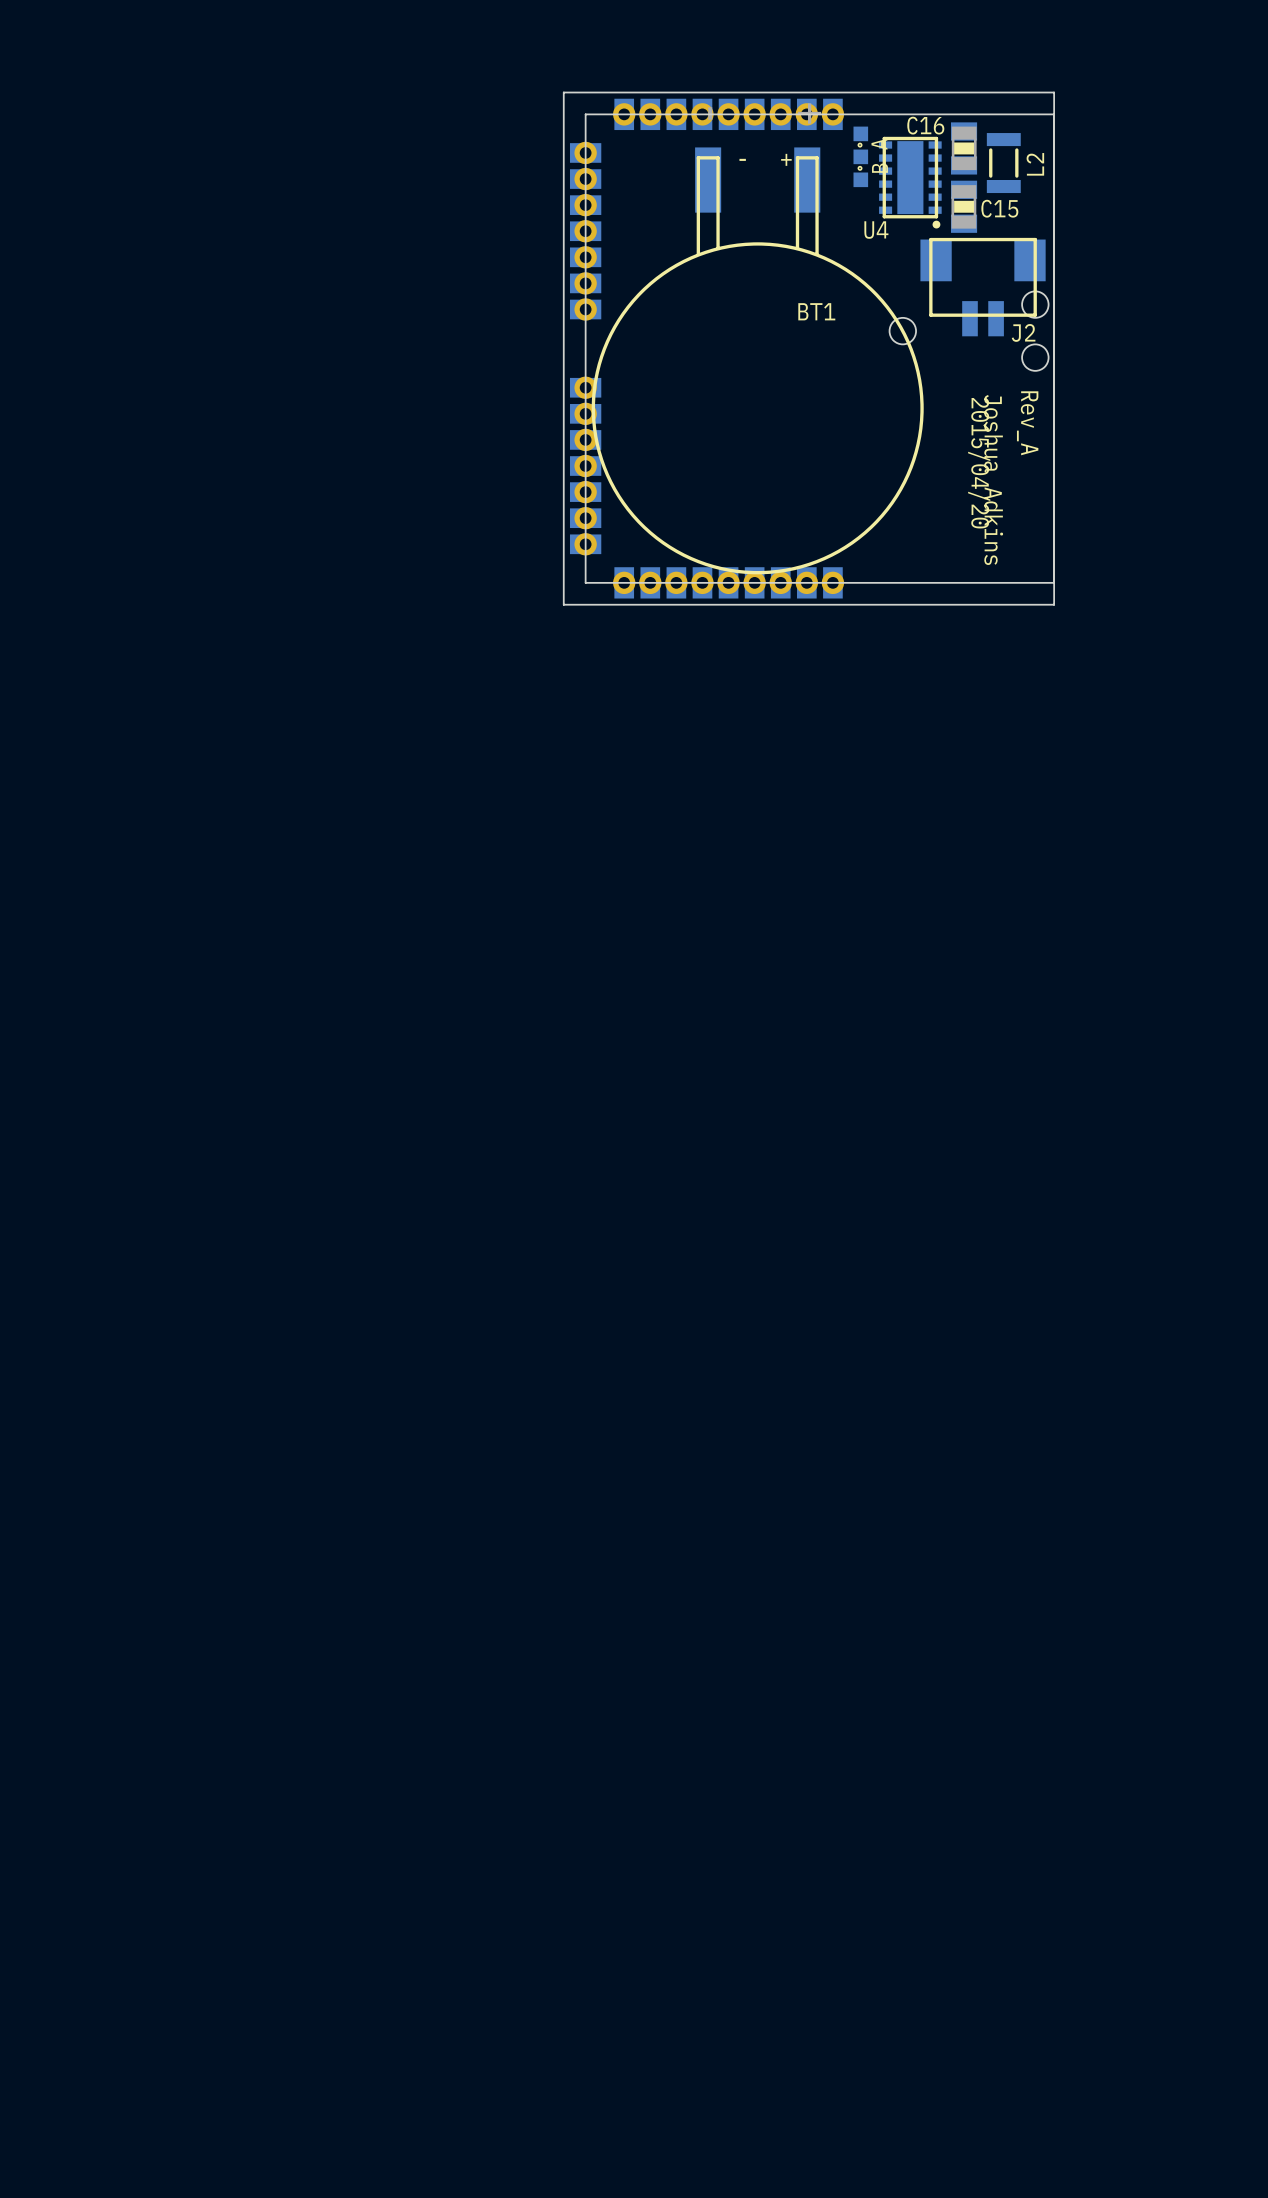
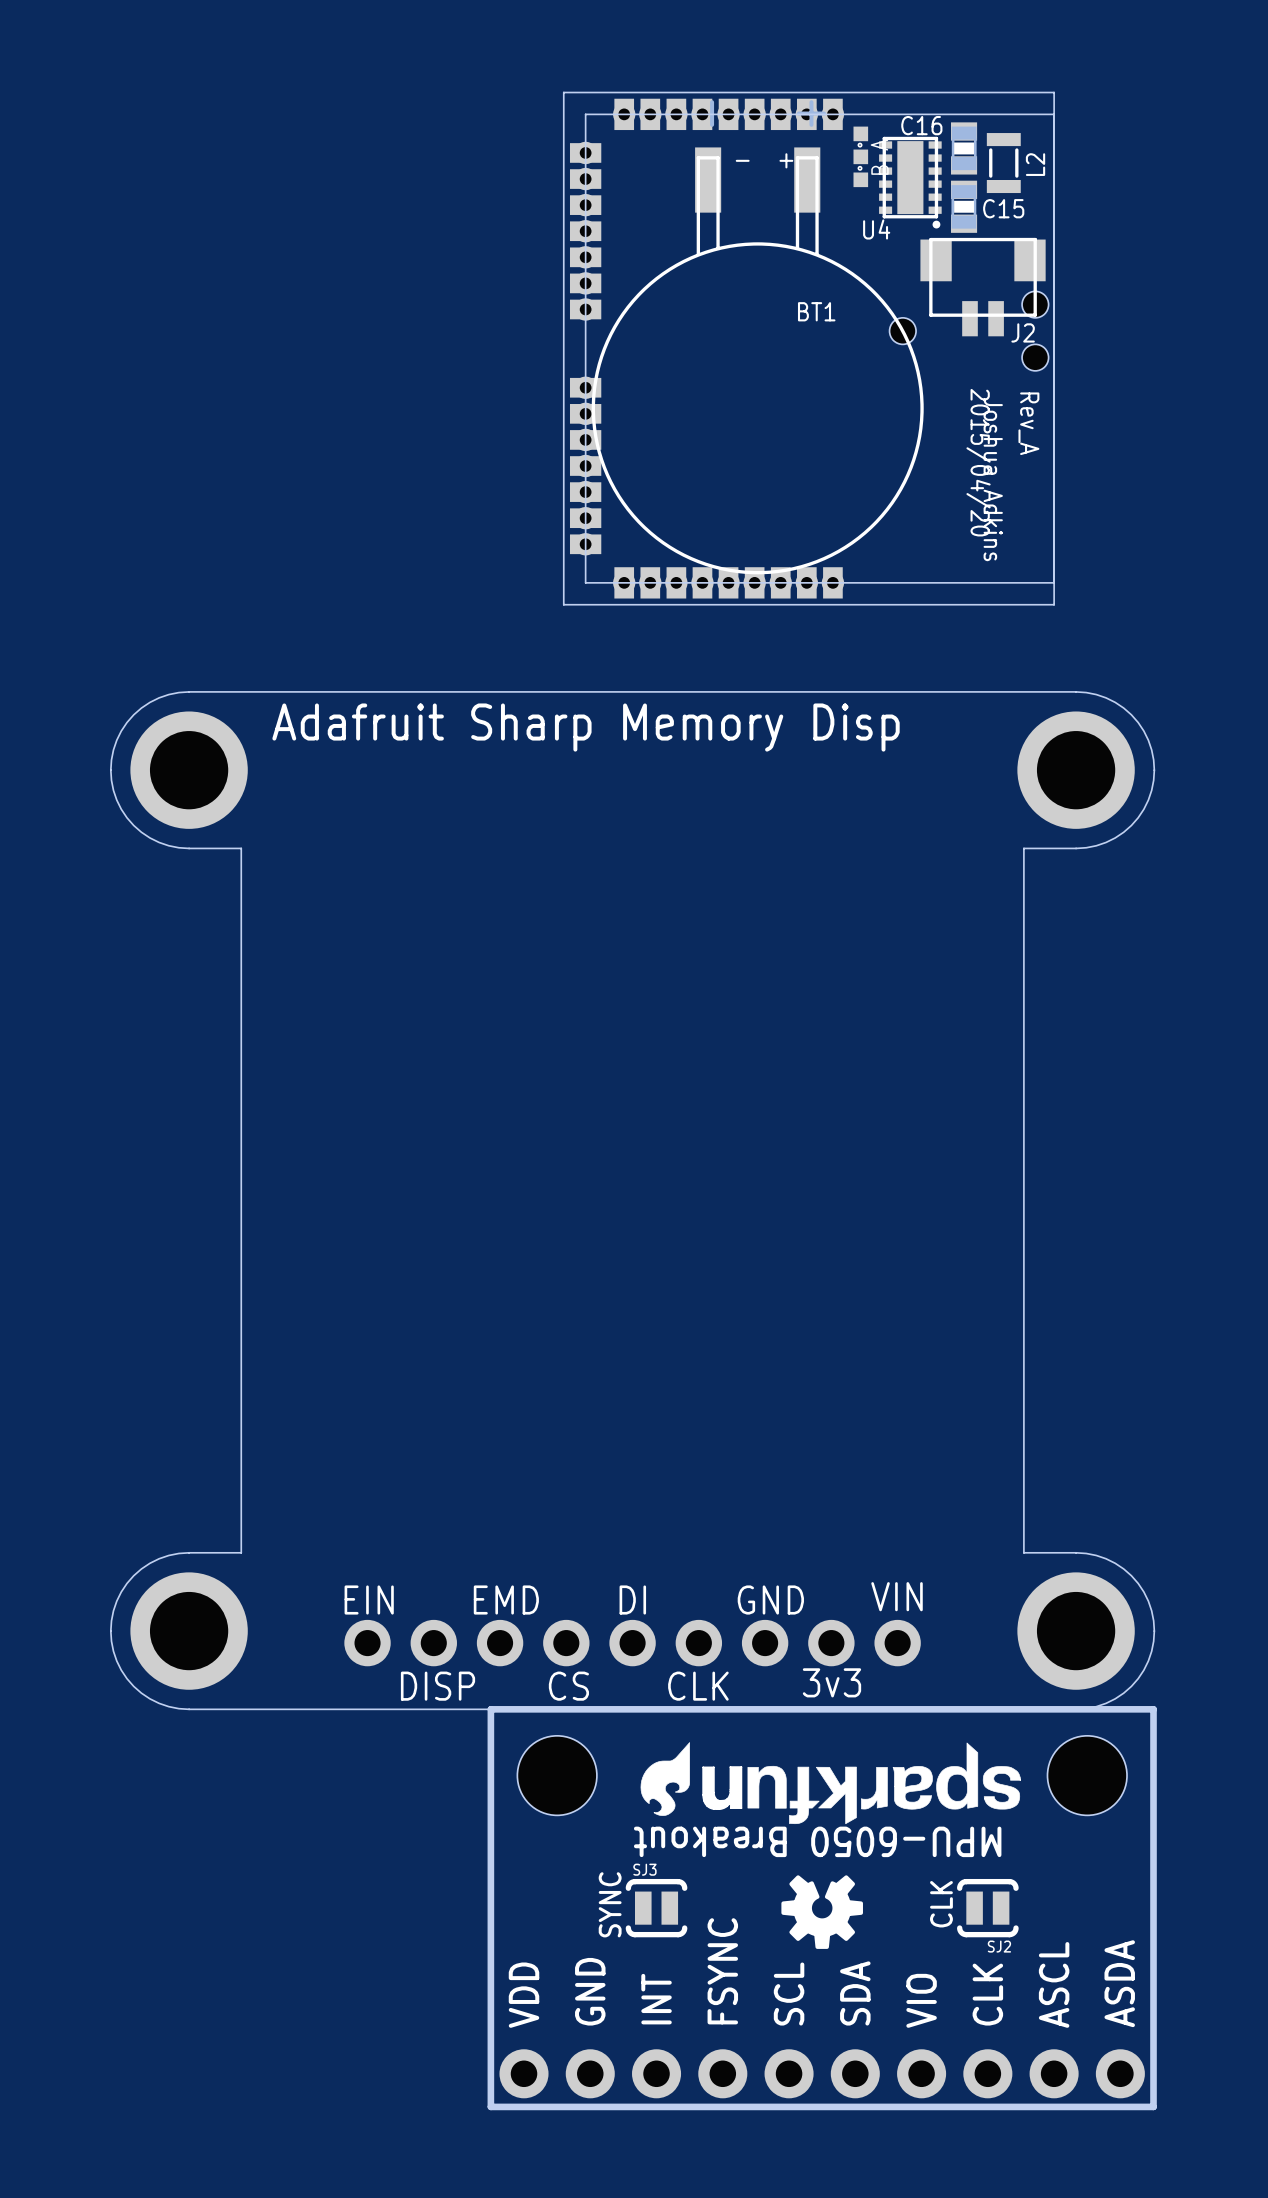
board edge: none -> (1076, 691) (189, 691) (159, 697) (133, 714) (116, 740) (110, 770) (113, 790) (127, 817) (141, 832) (168, 845) (189, 848) (241, 848) (241, 1552) (189, 1552) (168, 1555) (141, 1568) (127, 1583) (113, 1610) (110, 1631) (116, 1661) (133, 1686) (159, 1703) (189, 1709) (1076, 1709) (1106, 1703) (1131, 1686) (1148, 1661) (1154, 1631) (1151, 1610) (1138, 1583) (1123, 1568) (1096, 1555) (1076, 1552) (1023, 1552) (1023, 848) (1086, 847) (1115, 837) (1131, 825) (1143, 809) (1151, 790) (1154, 770) (1148, 740) (1131, 714) (1106, 697) (1076, 691)
text: none -> Adafruit Sharp Memory Disp (586, 727)
part: none -> (189, 770)
part: none -> (1076, 770)
text: none -> VIN (897, 1596)
text: none -> EIN (369, 1600)
text: none -> EMD (506, 1600)
text: none -> DI (632, 1600)
text: none -> GND (770, 1600)
part: none -> (189, 1631)
part: none -> (1076, 1631)
part: none -> (632, 1643)
text: none -> 3v3 (831, 1682)
text: none -> DISP (438, 1686)
text: none -> CS (568, 1686)
text: none -> CLK (698, 1686)
board edge: none -> (1153, 1709) (490, 1709) (490, 2106) (1153, 2106) (1153, 1709)
drawing: none -> [640, 1742, 1021, 1825]
part: none -> (557, 1775)
part: none -> (1087, 1775)
text: none -> MPU-6050 Breakout (817, 1841)
drawing: none -> [781, 1875, 863, 1949]
text: none -> CLK (941, 1904)
SJ3: none -> (656, 1908)
SJ2: none -> (987, 1908)
text: none -> SYNC (610, 1904)
text: none -> FSYNC (722, 1971)
text: none -> ASDA (1119, 1983)
text: none -> ASCL (1054, 1984)
text: none -> INT (656, 1999)
text: none -> GND (590, 1991)
text: none -> SDA (855, 1993)
text: none -> CLK (987, 1994)
text: none -> VDD (524, 1995)
text: none -> SCL (789, 1994)
text: none -> VIO (921, 2000)
part: none -> (822, 2073)

